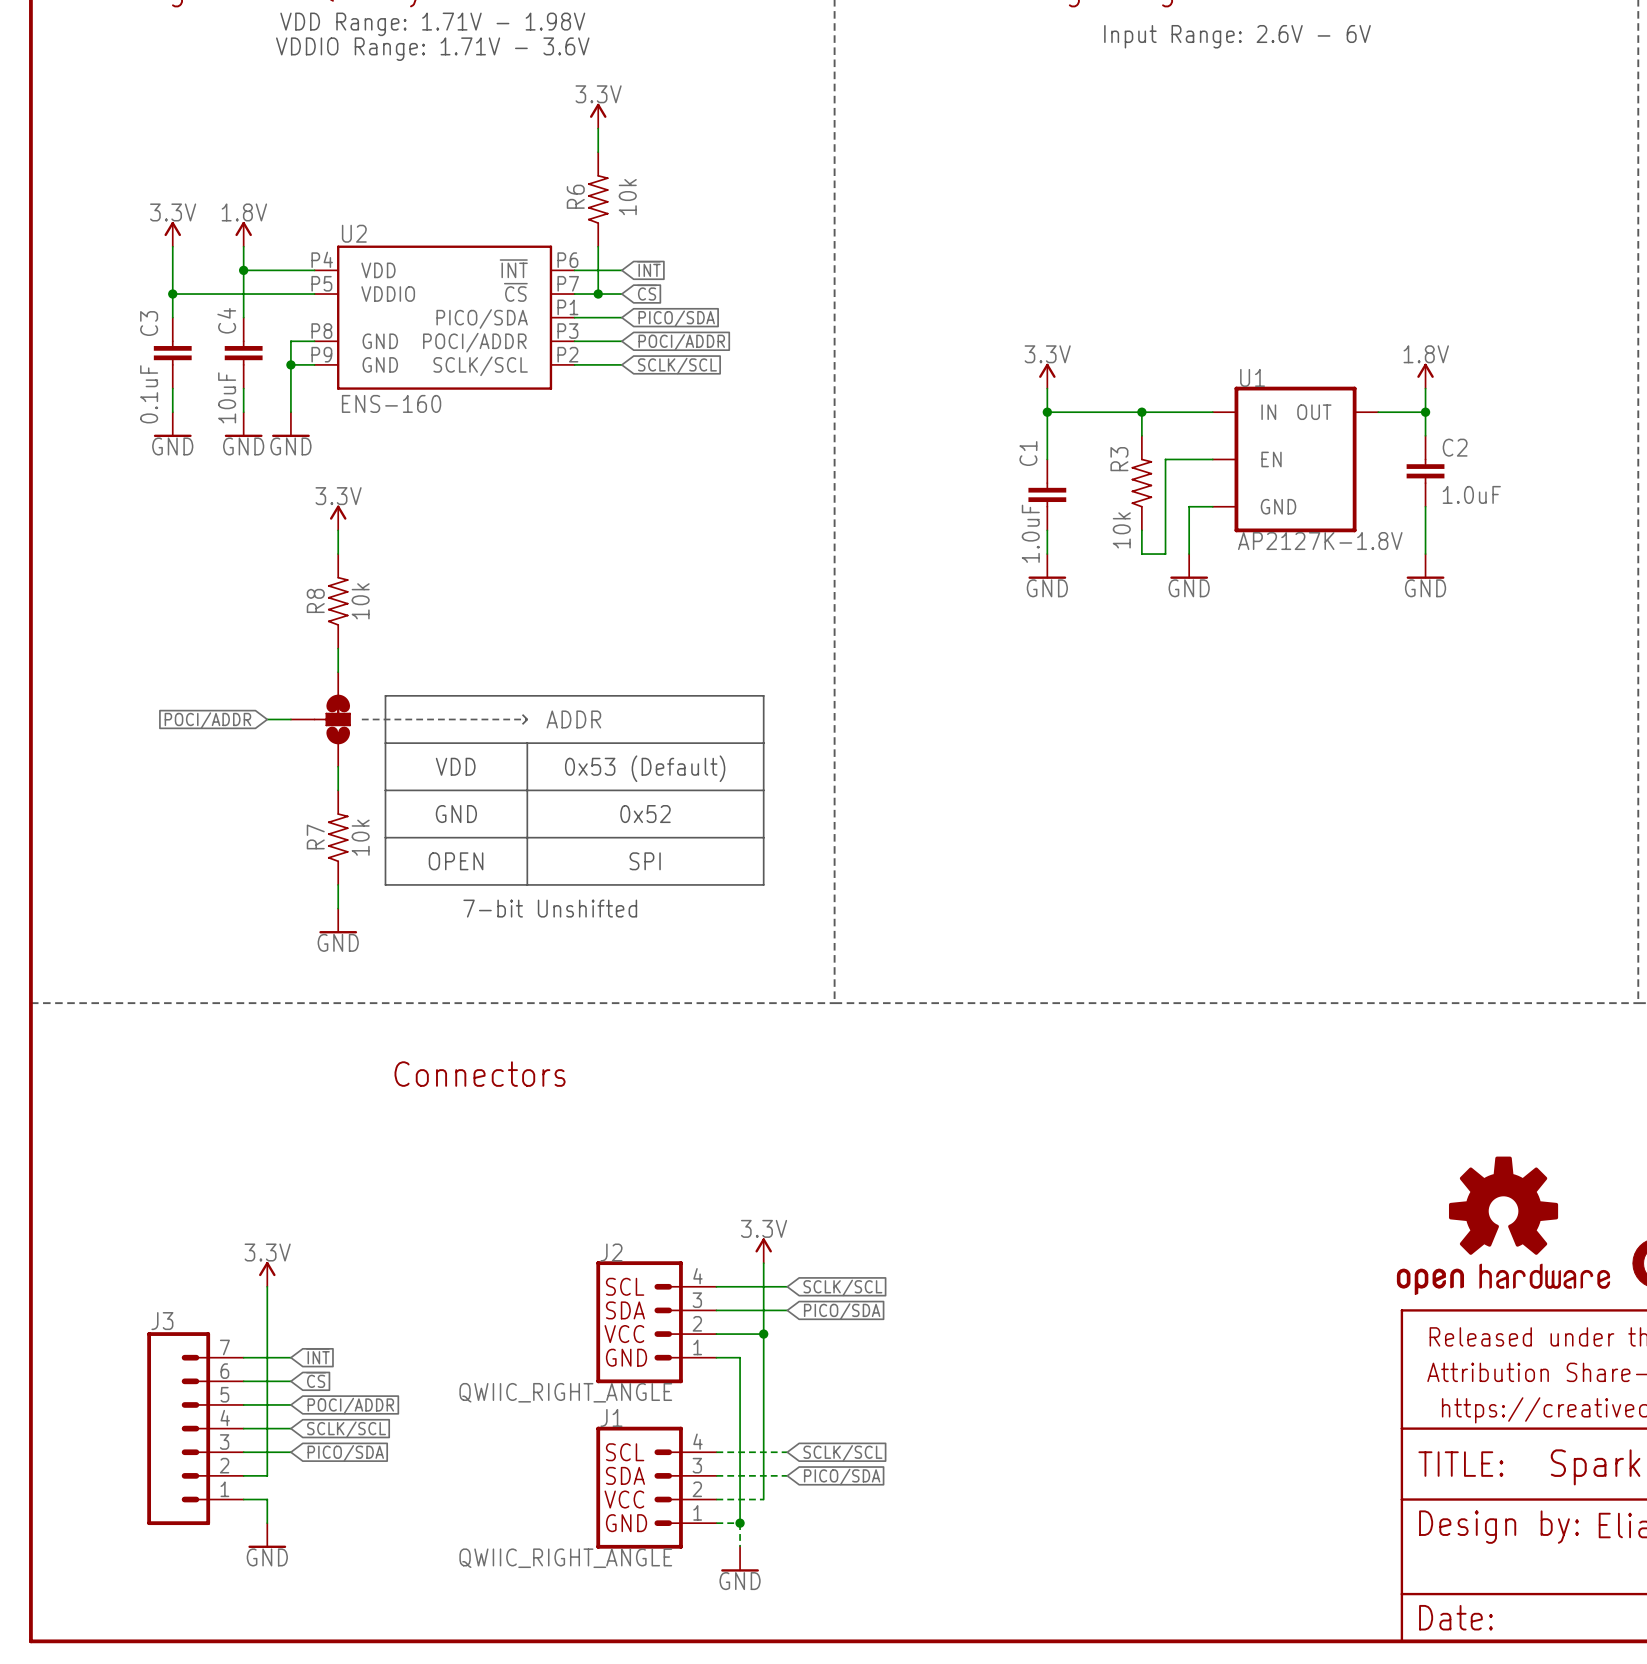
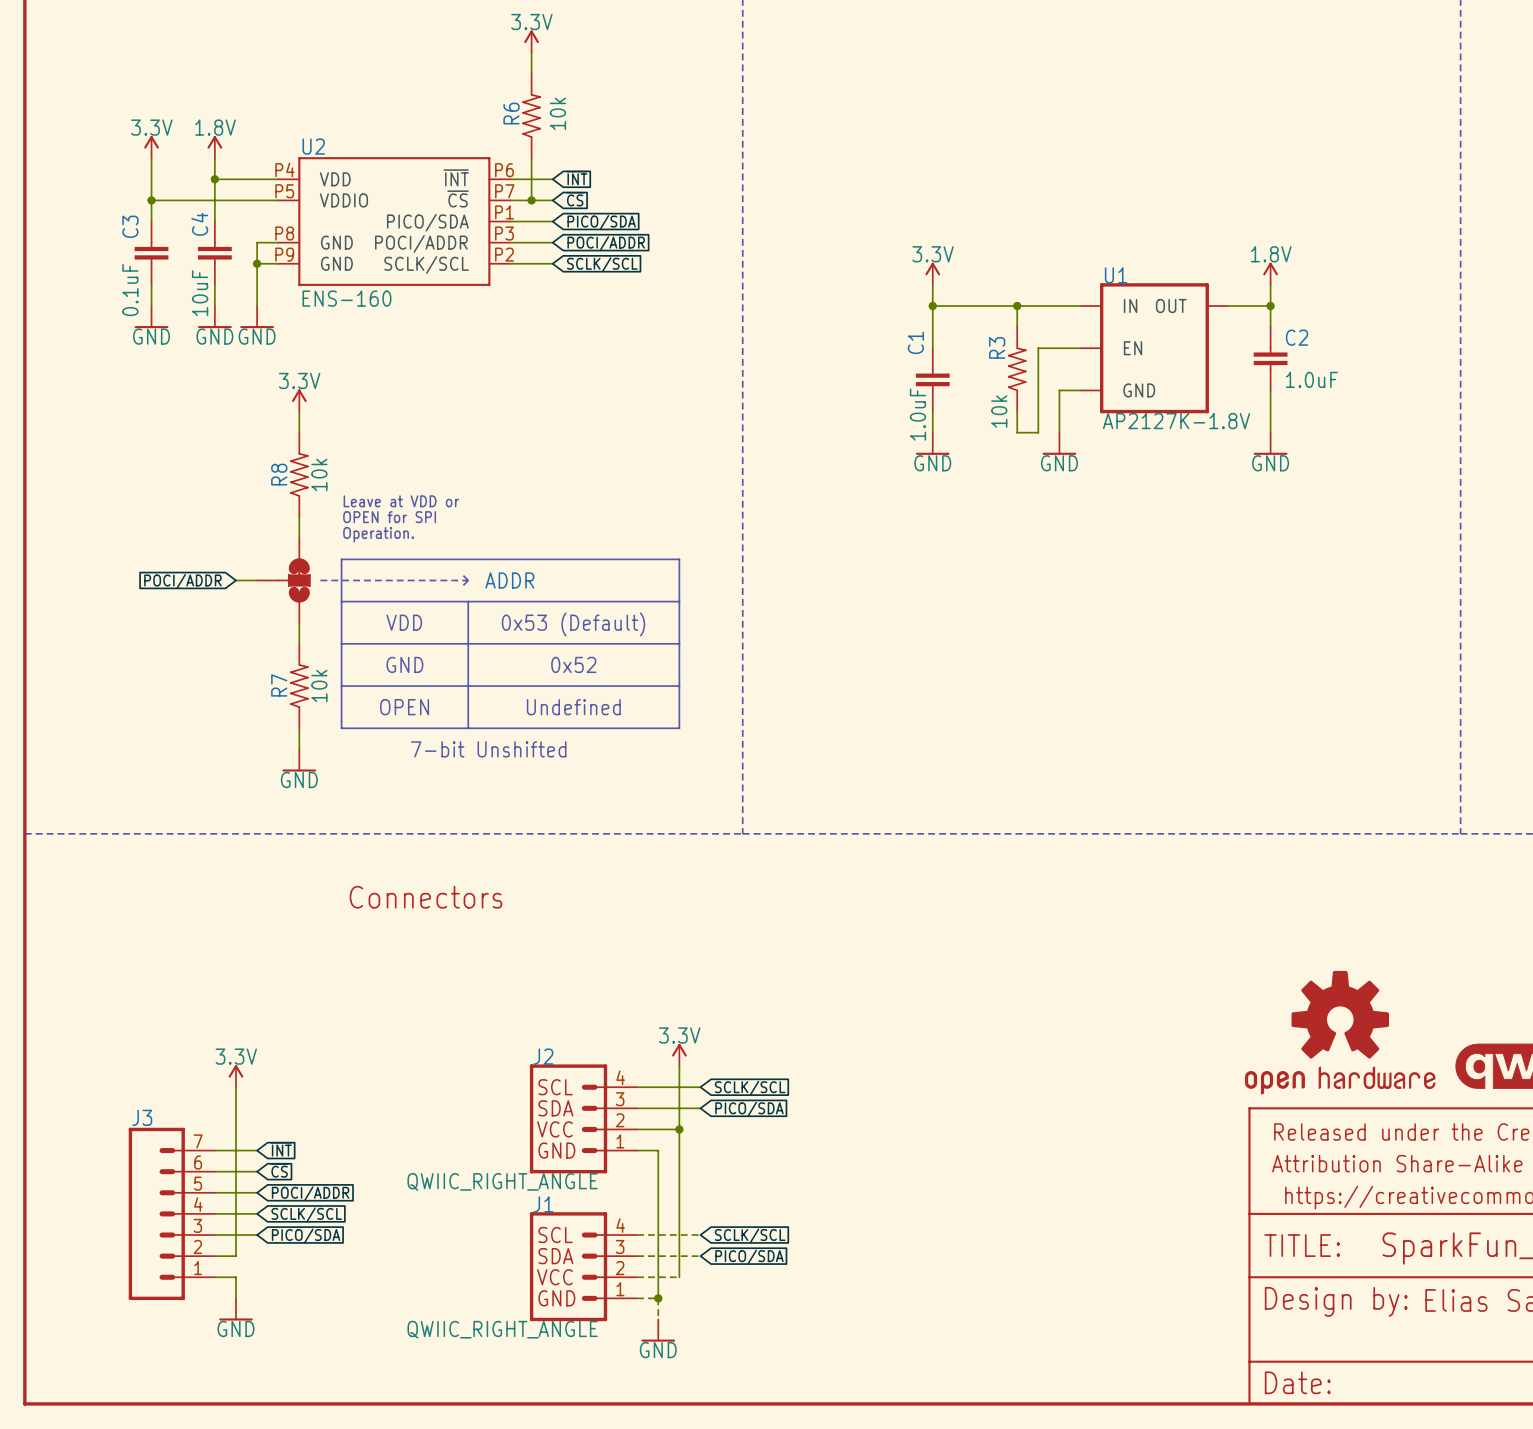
text: none -> Leave at VDD or (401, 501)
text: none -> OPEN for SPI (389, 517)
text: none -> Operation. (378, 534)
text: SPI (645, 861) -> Undefined (573, 707)

